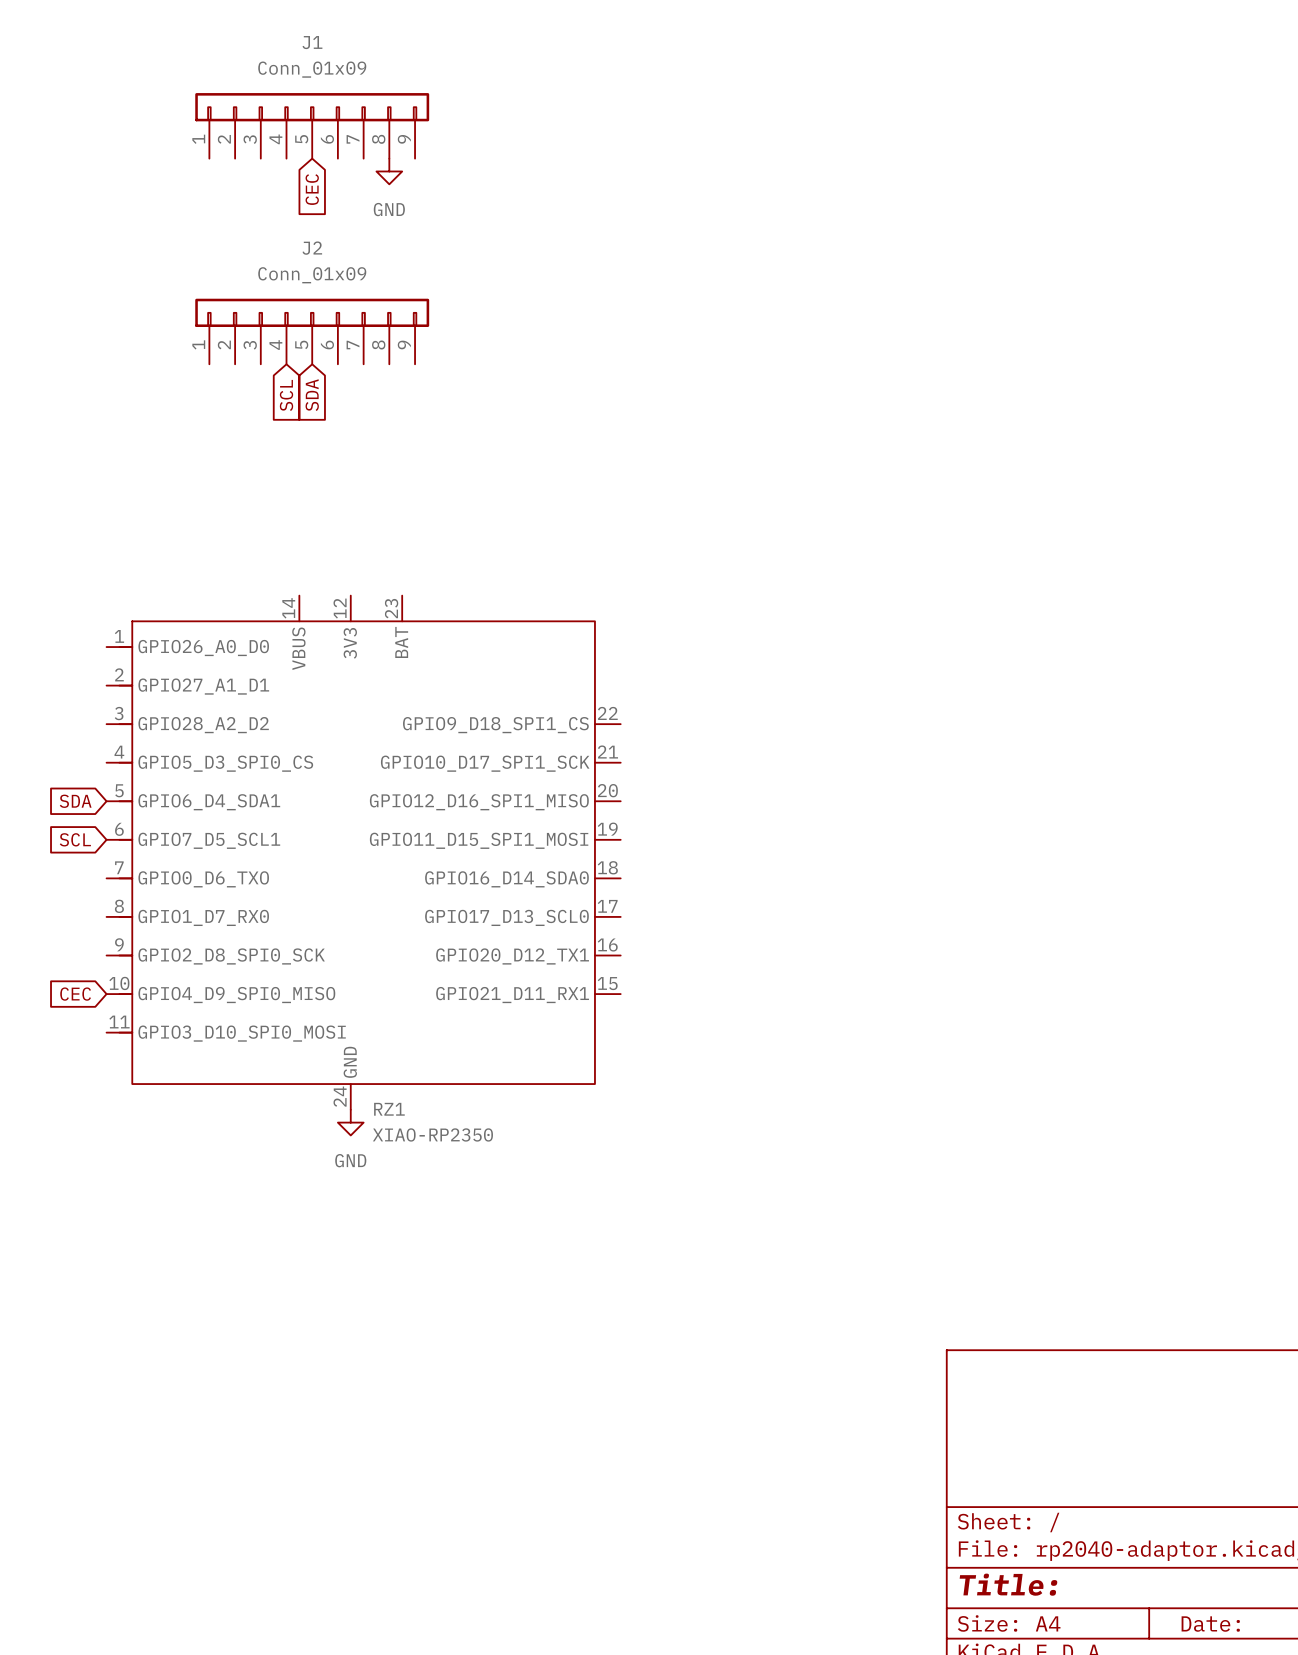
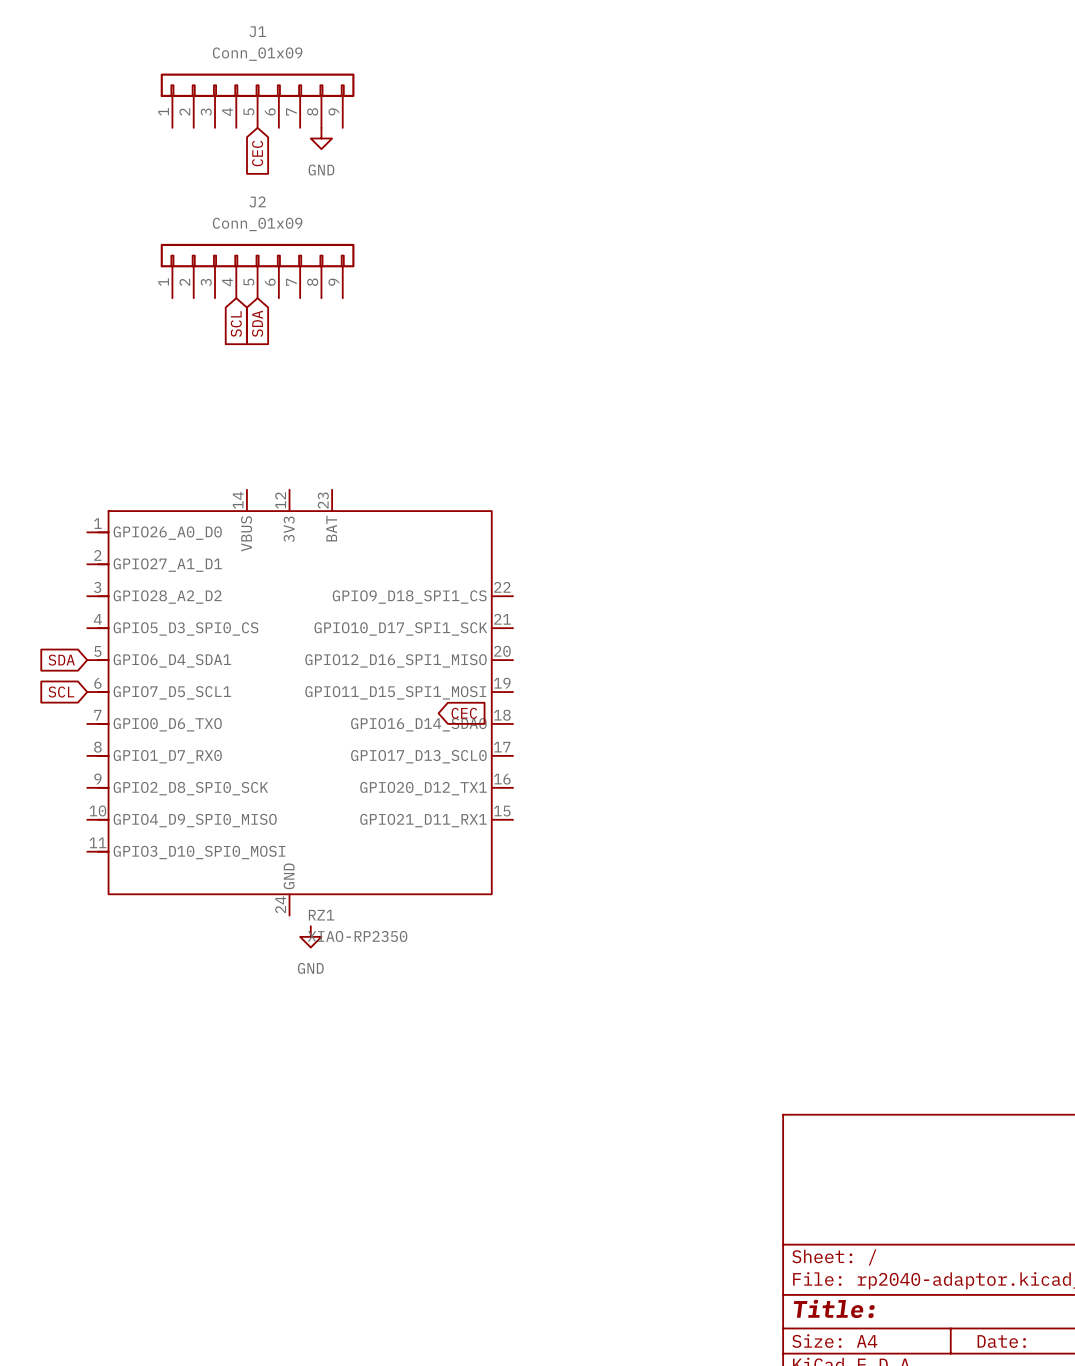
global label: none -> CEC (464, 713)
global label: CEC (75, 994) -> none
power symbol position: GND (350, 1122) -> GND (310, 936)

